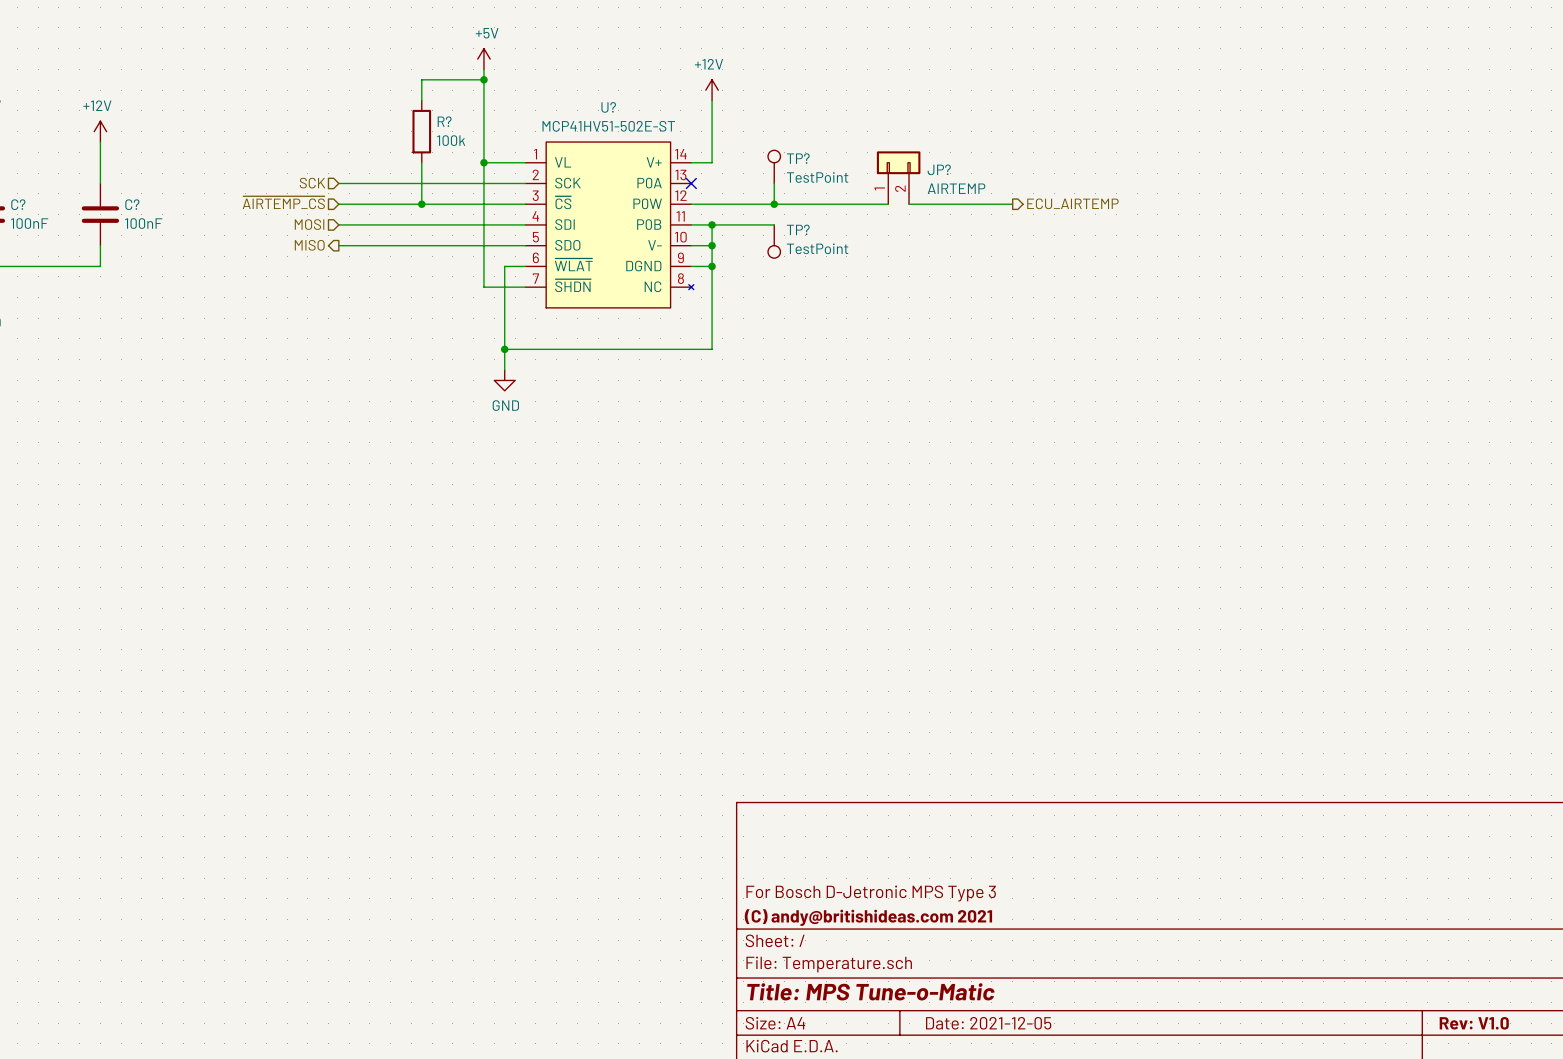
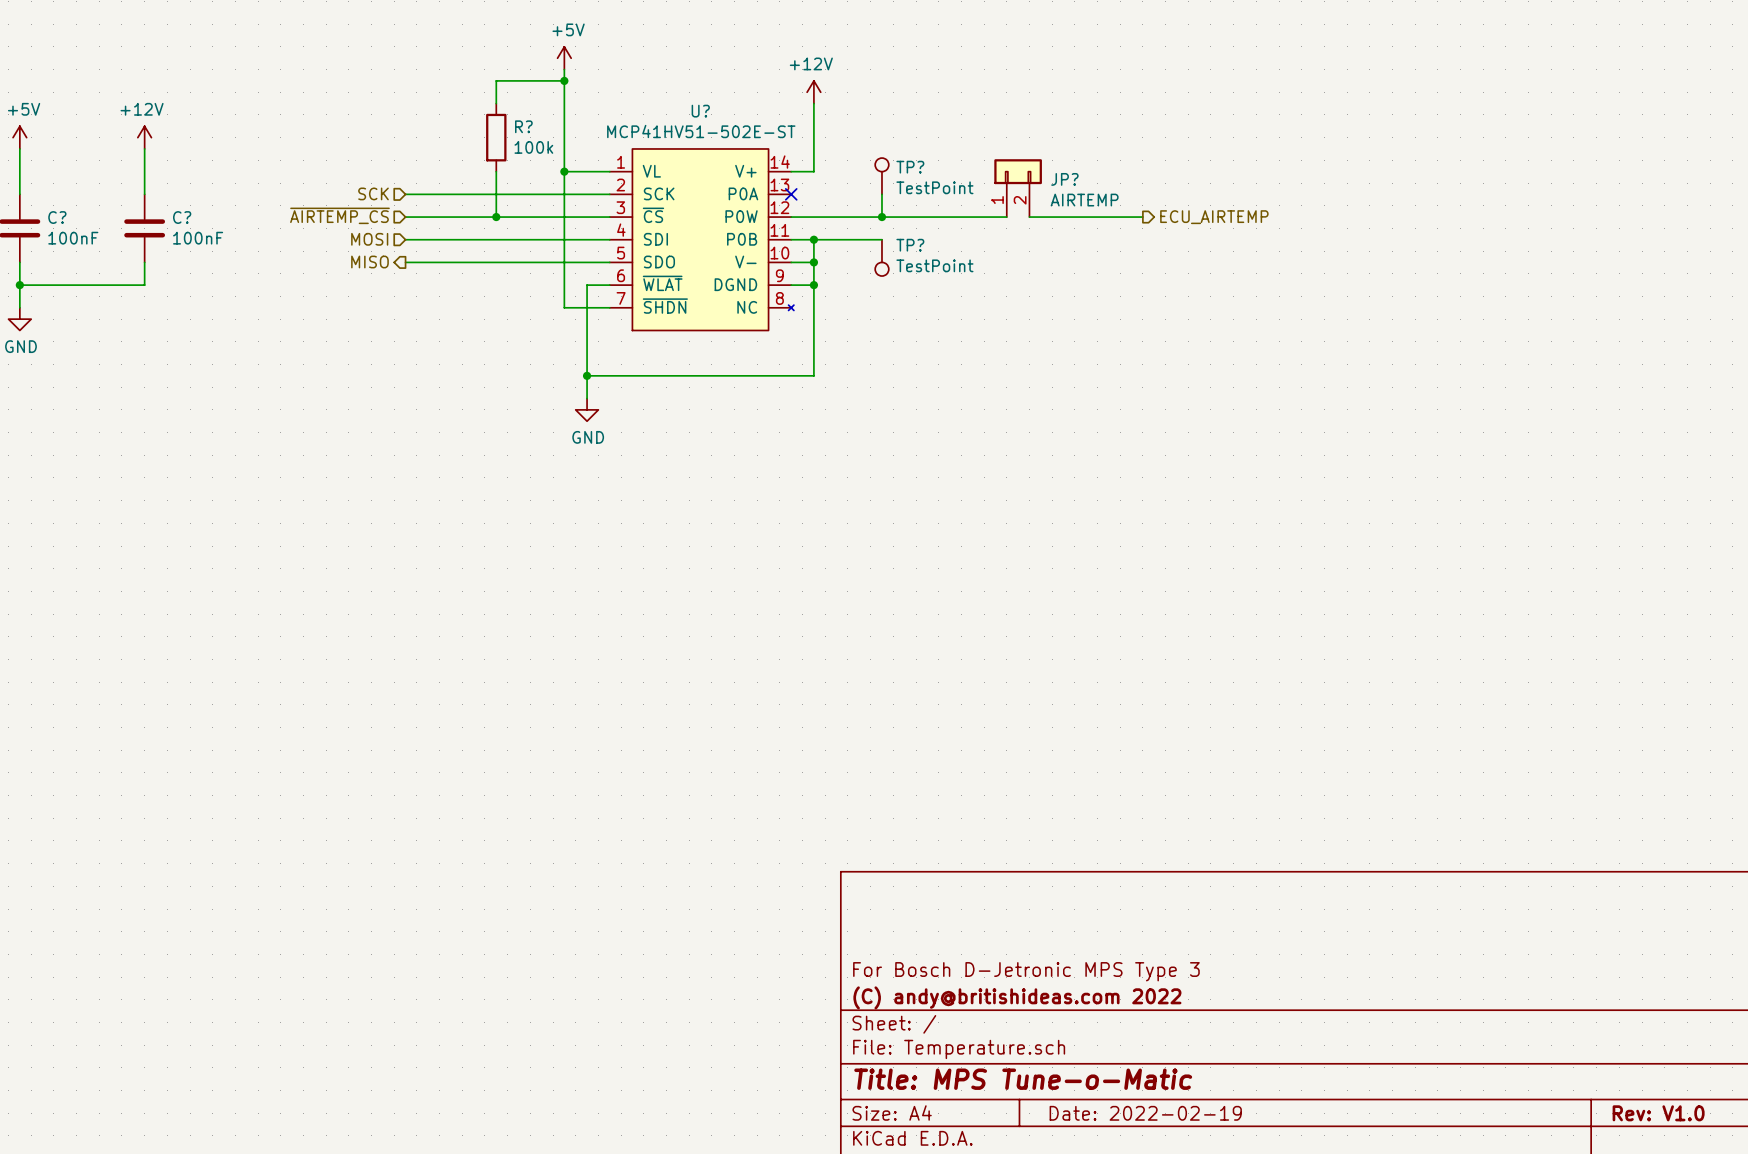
title block: (C) andy@britishideas.com 2021 (868, 917) -> (C) andy@britishideas.com 2022 (1017, 997)
title block: Date: 2021-12-05 (988, 1023) -> Date: 2022-02-19 (1145, 1113)

